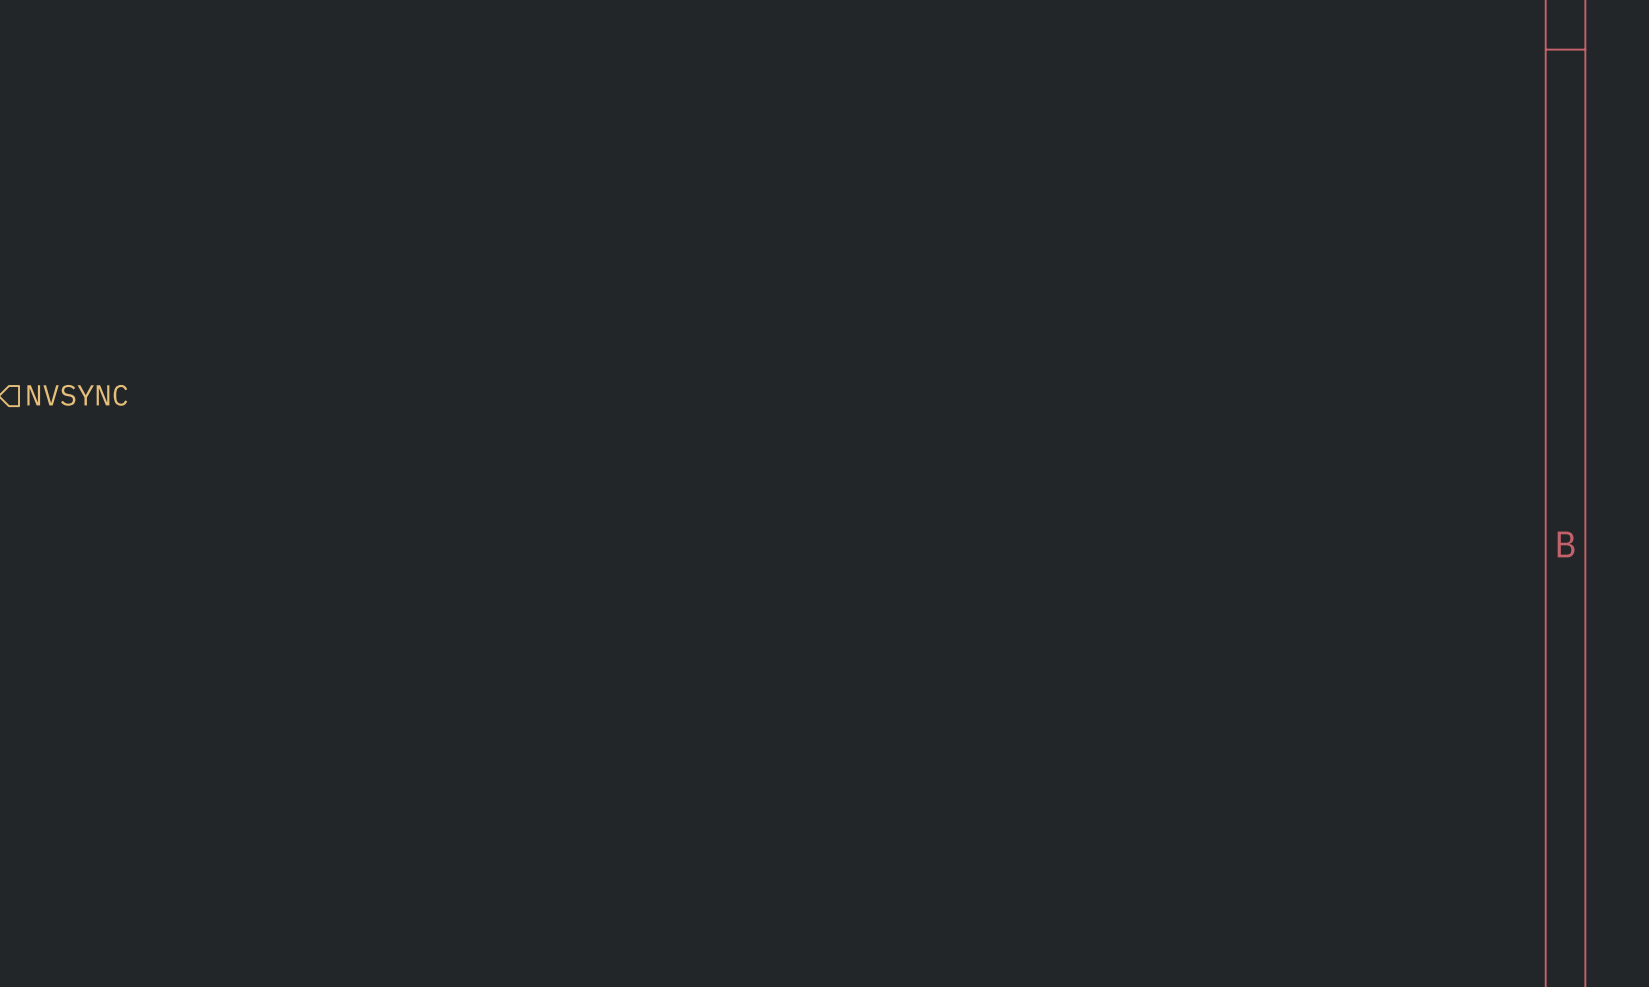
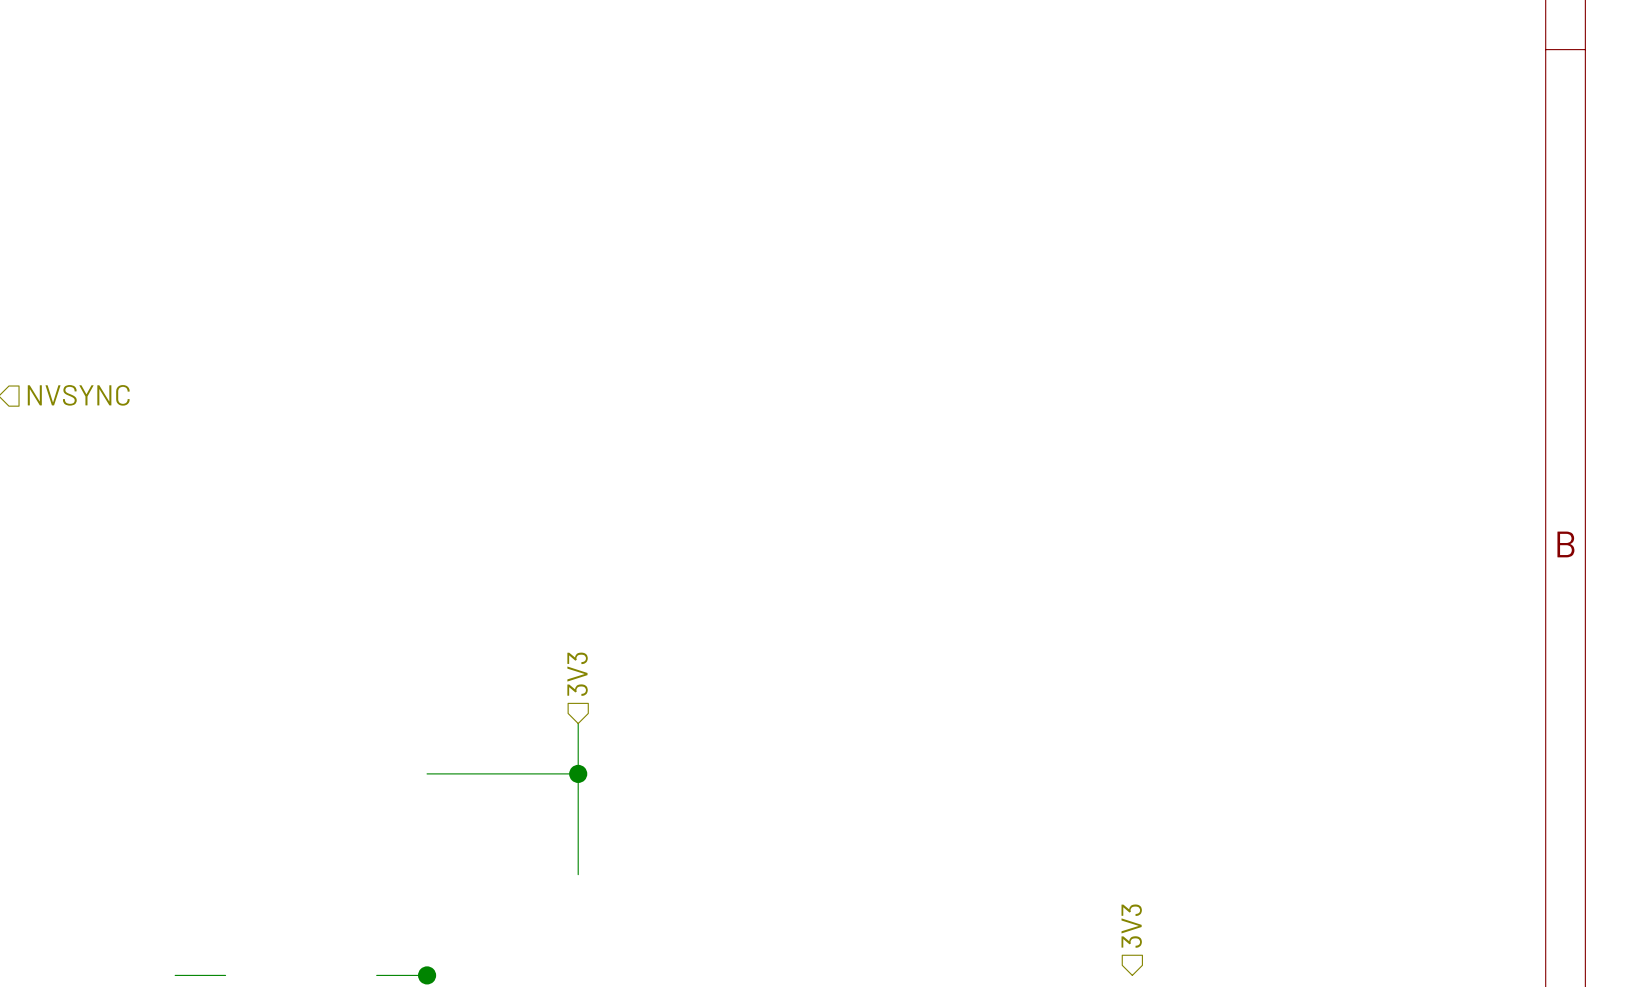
hierarchical label: none -> 3V3 (577, 674)
wire: none -> (578, 723) (578, 874)
wire: none -> (427, 773) (578, 773)
junction: none -> (578, 773)
hierarchical label: none -> 3V3 (1131, 926)
wire: none -> (175, 975) (225, 975)
wire: none -> (376, 975) (427, 975)
junction: none -> (427, 975)

